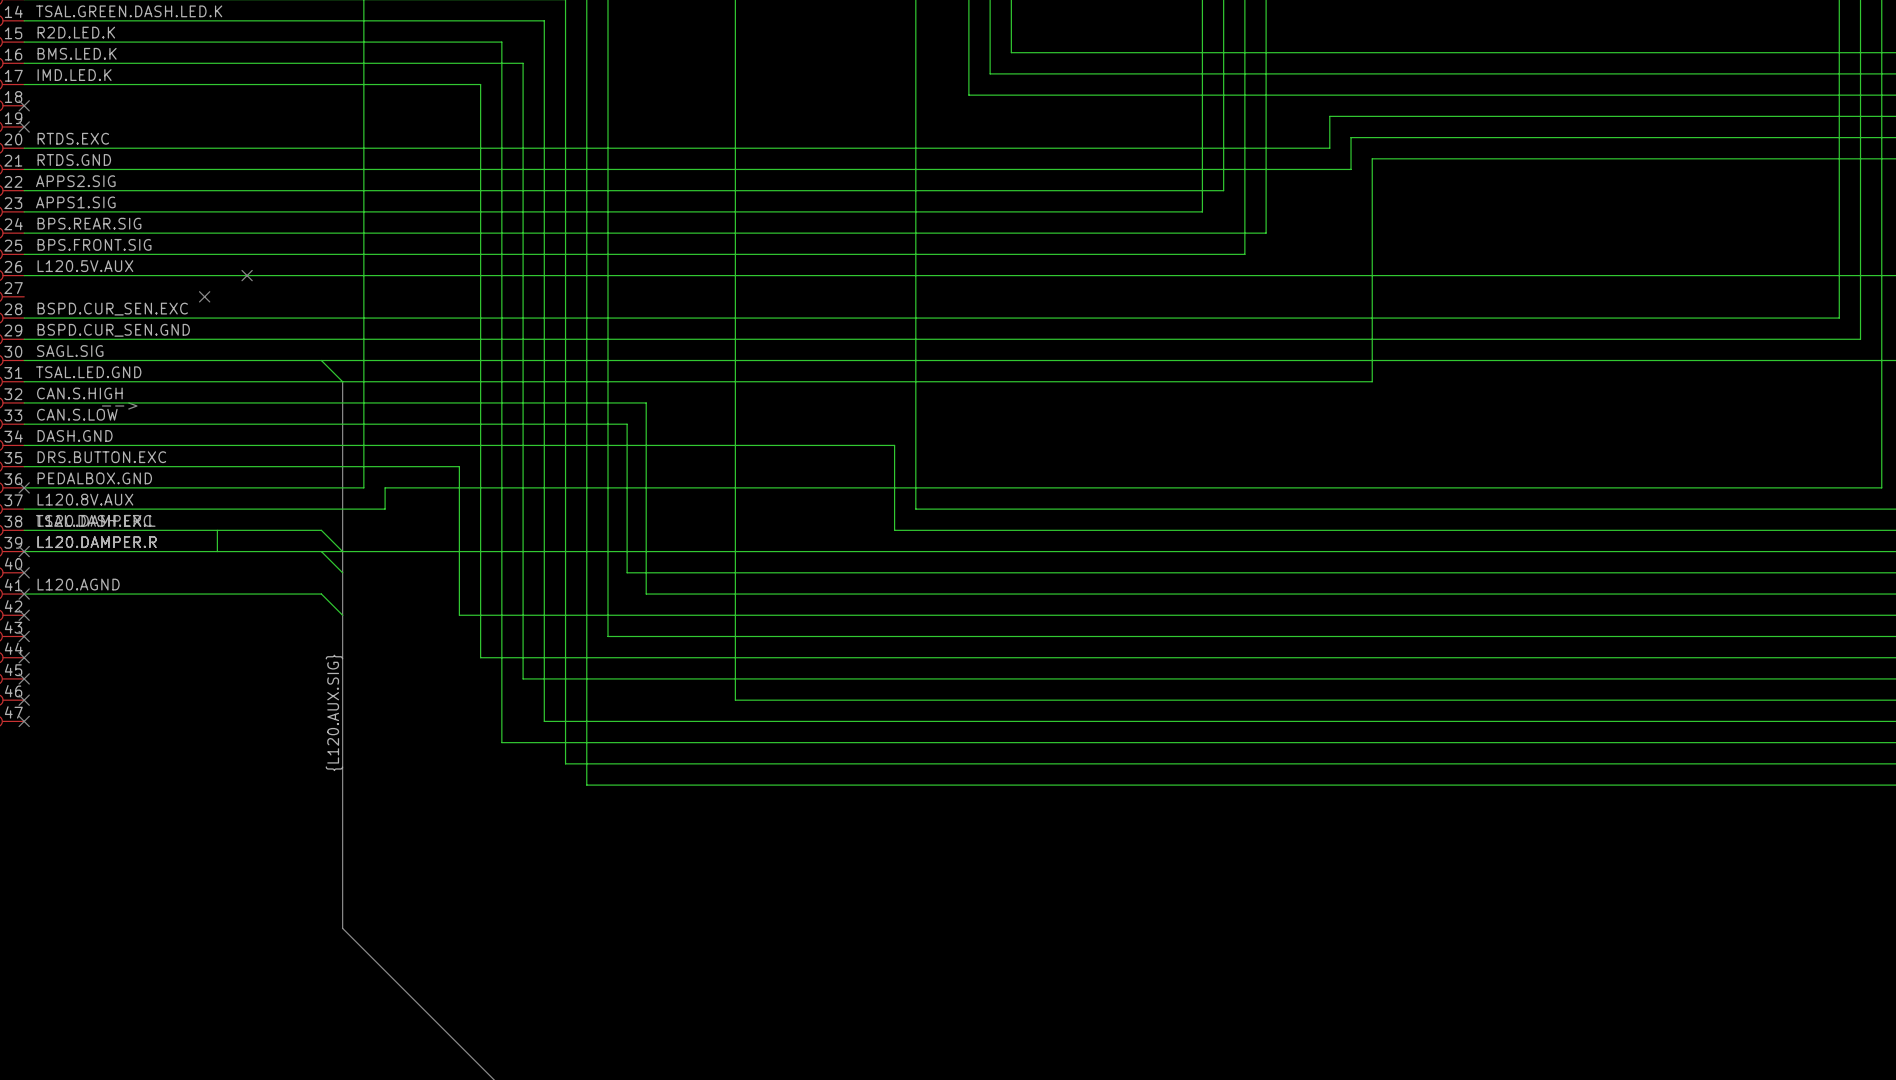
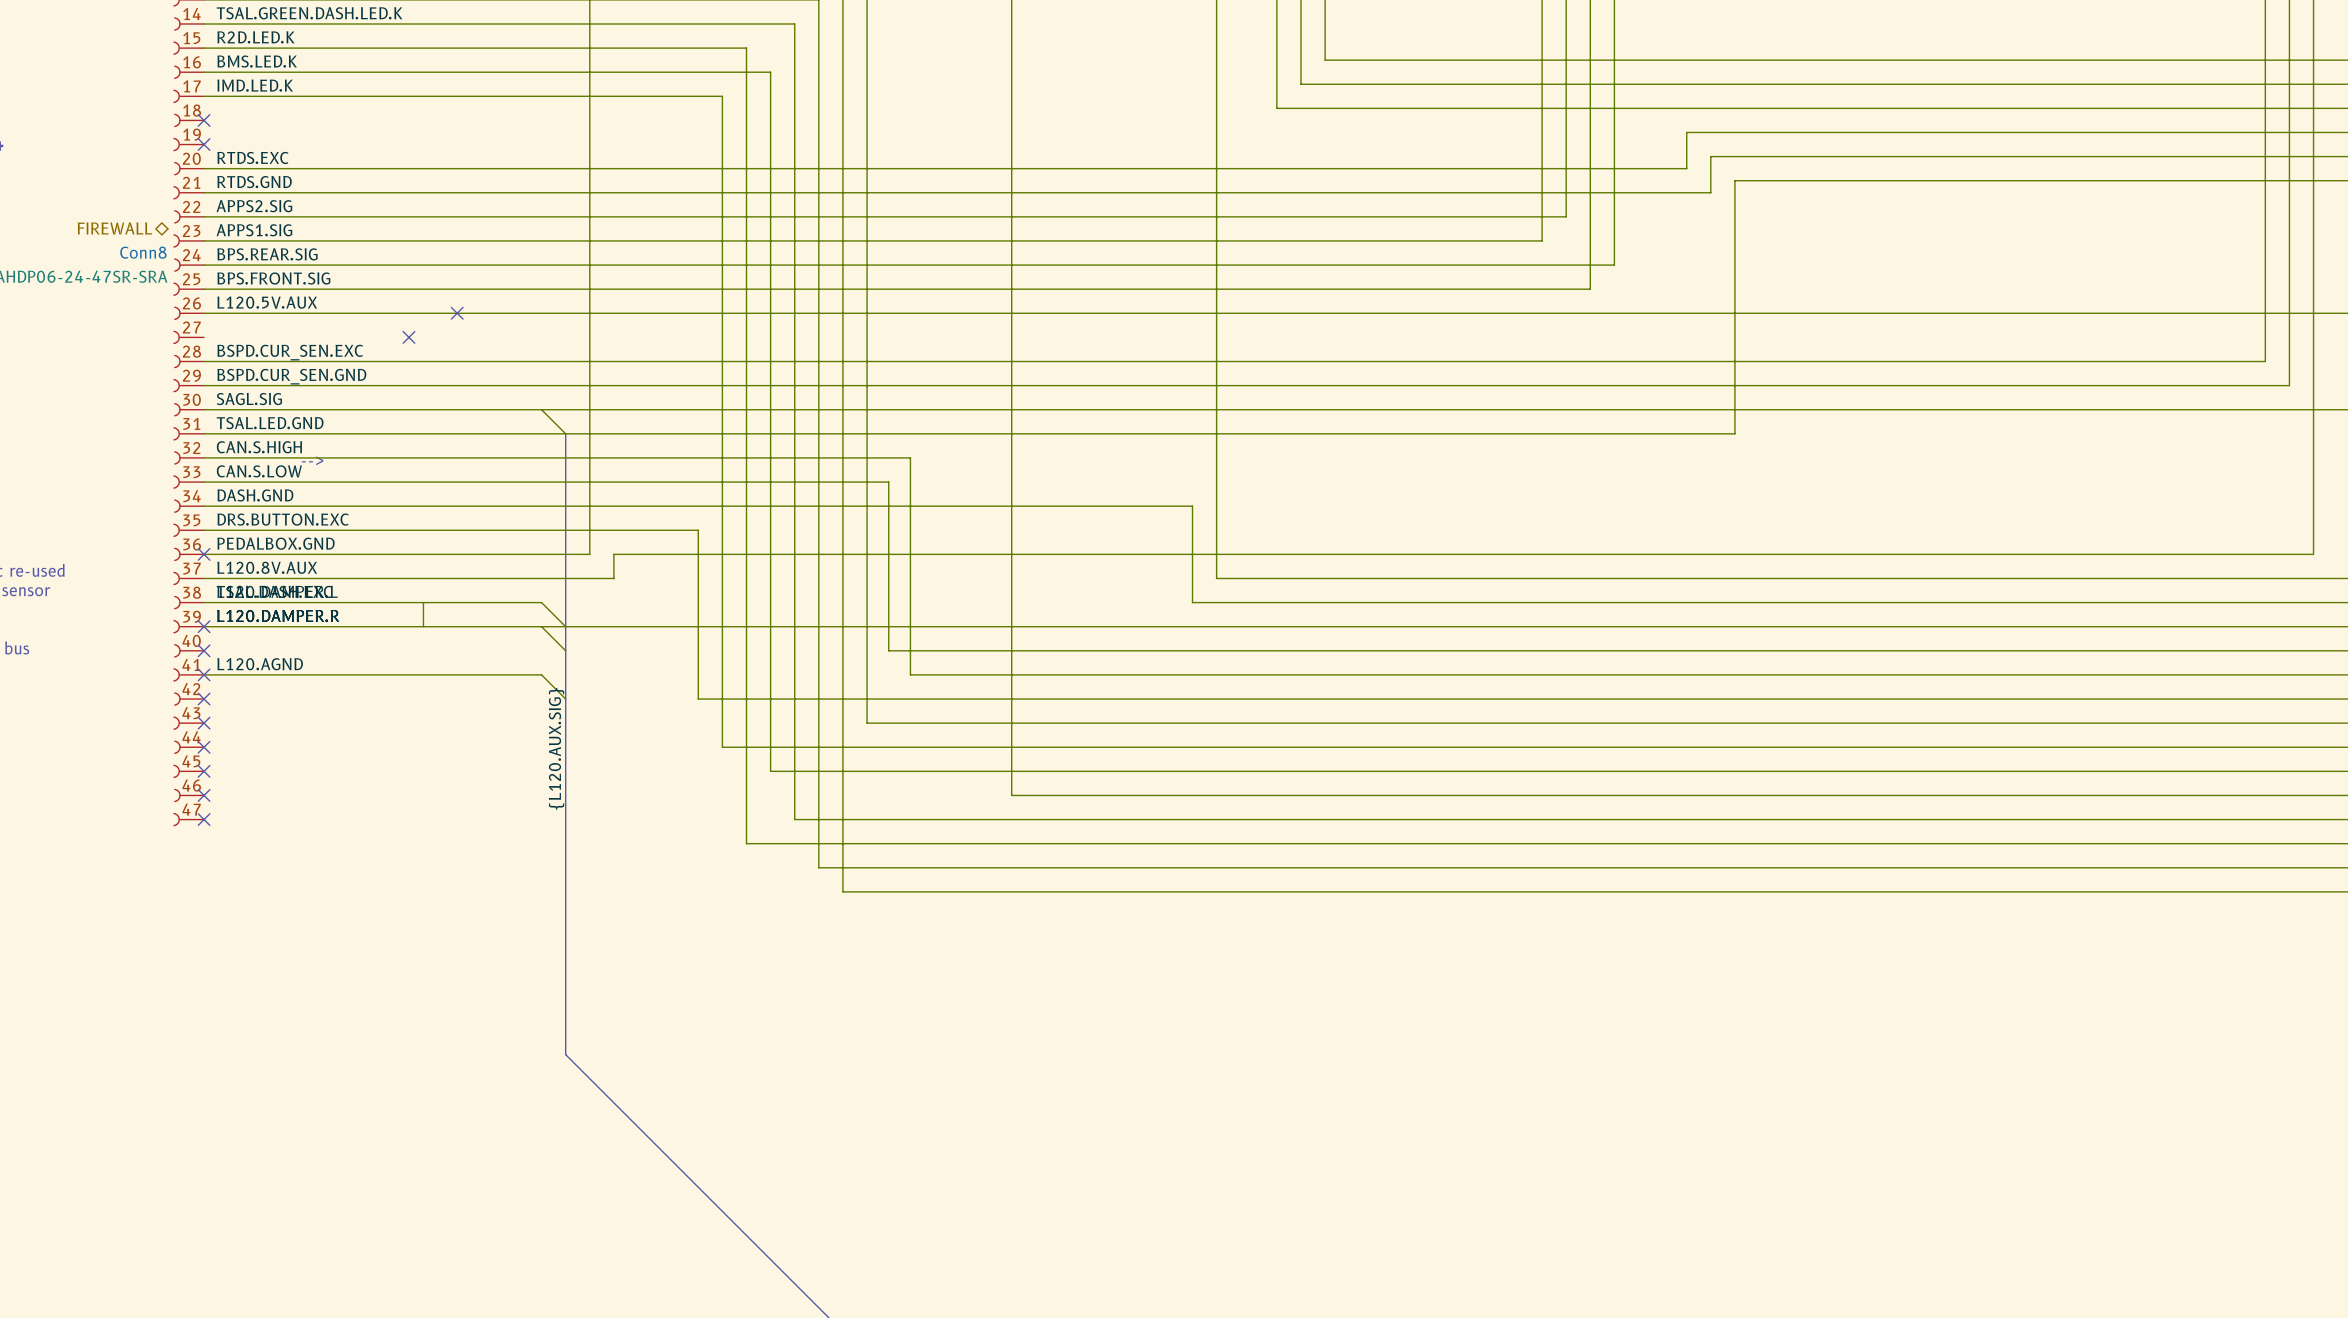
label position: {L120.AUX.SIG} (334, 712) -> {L120.AUX.SIG} (556, 748)

